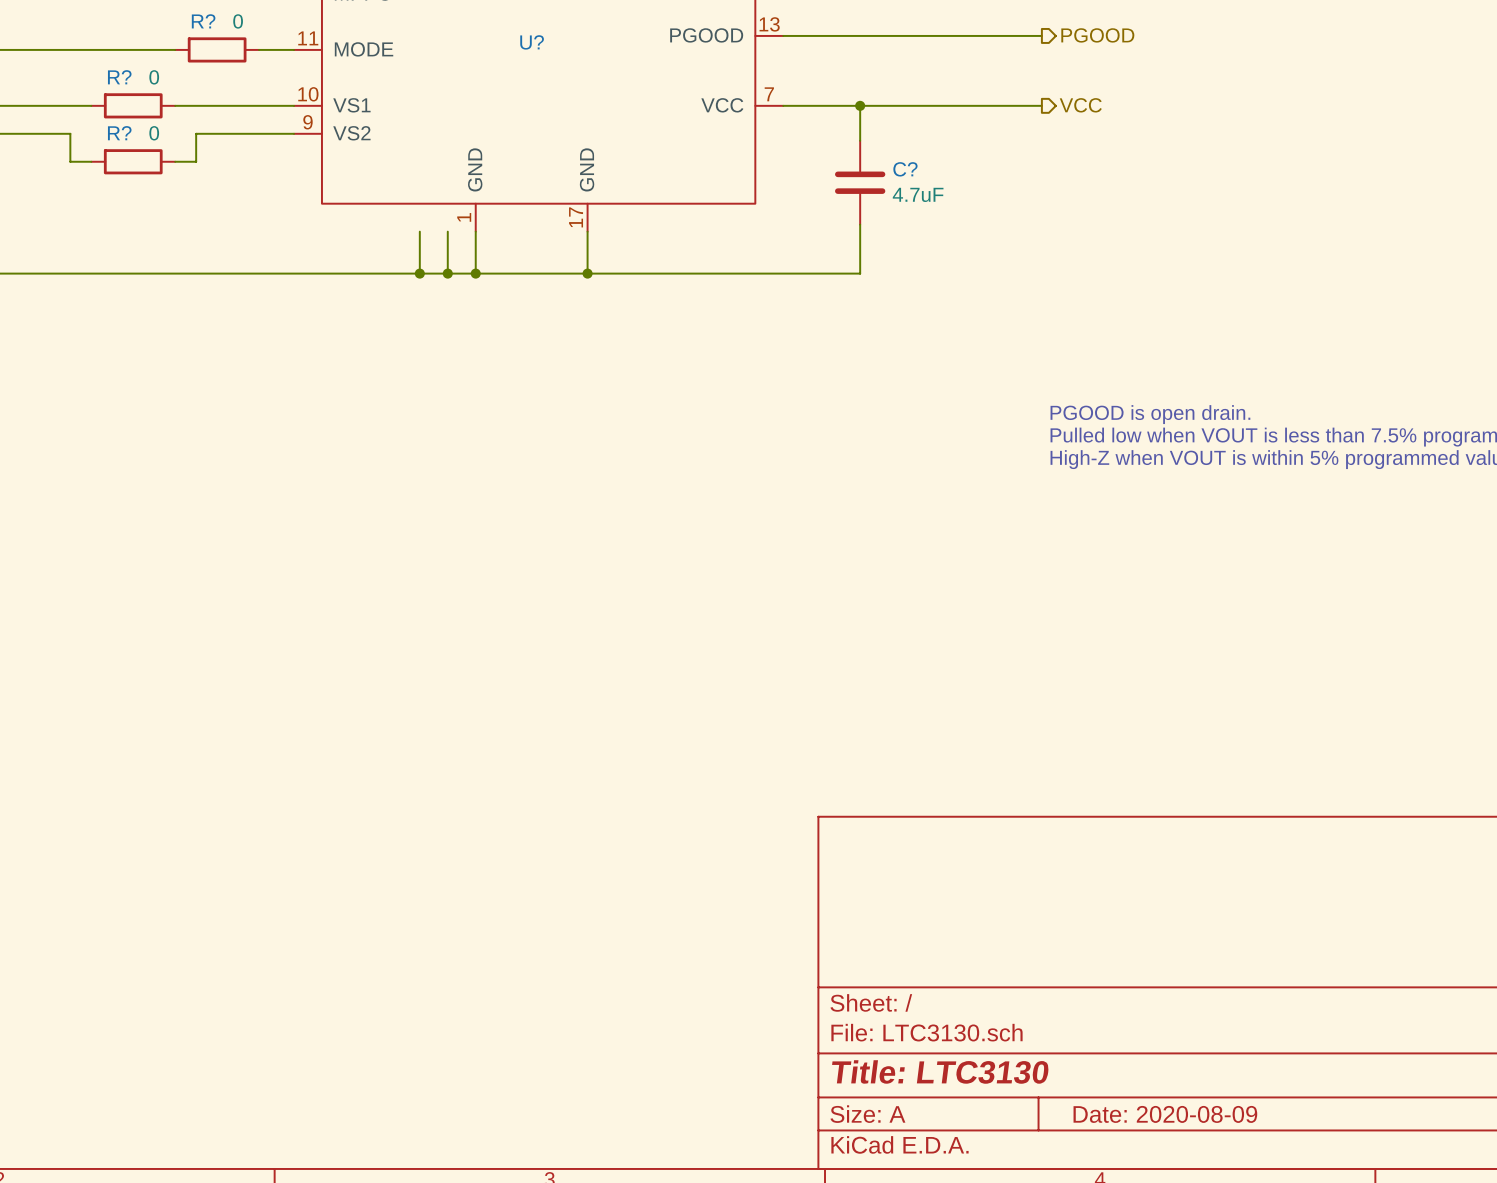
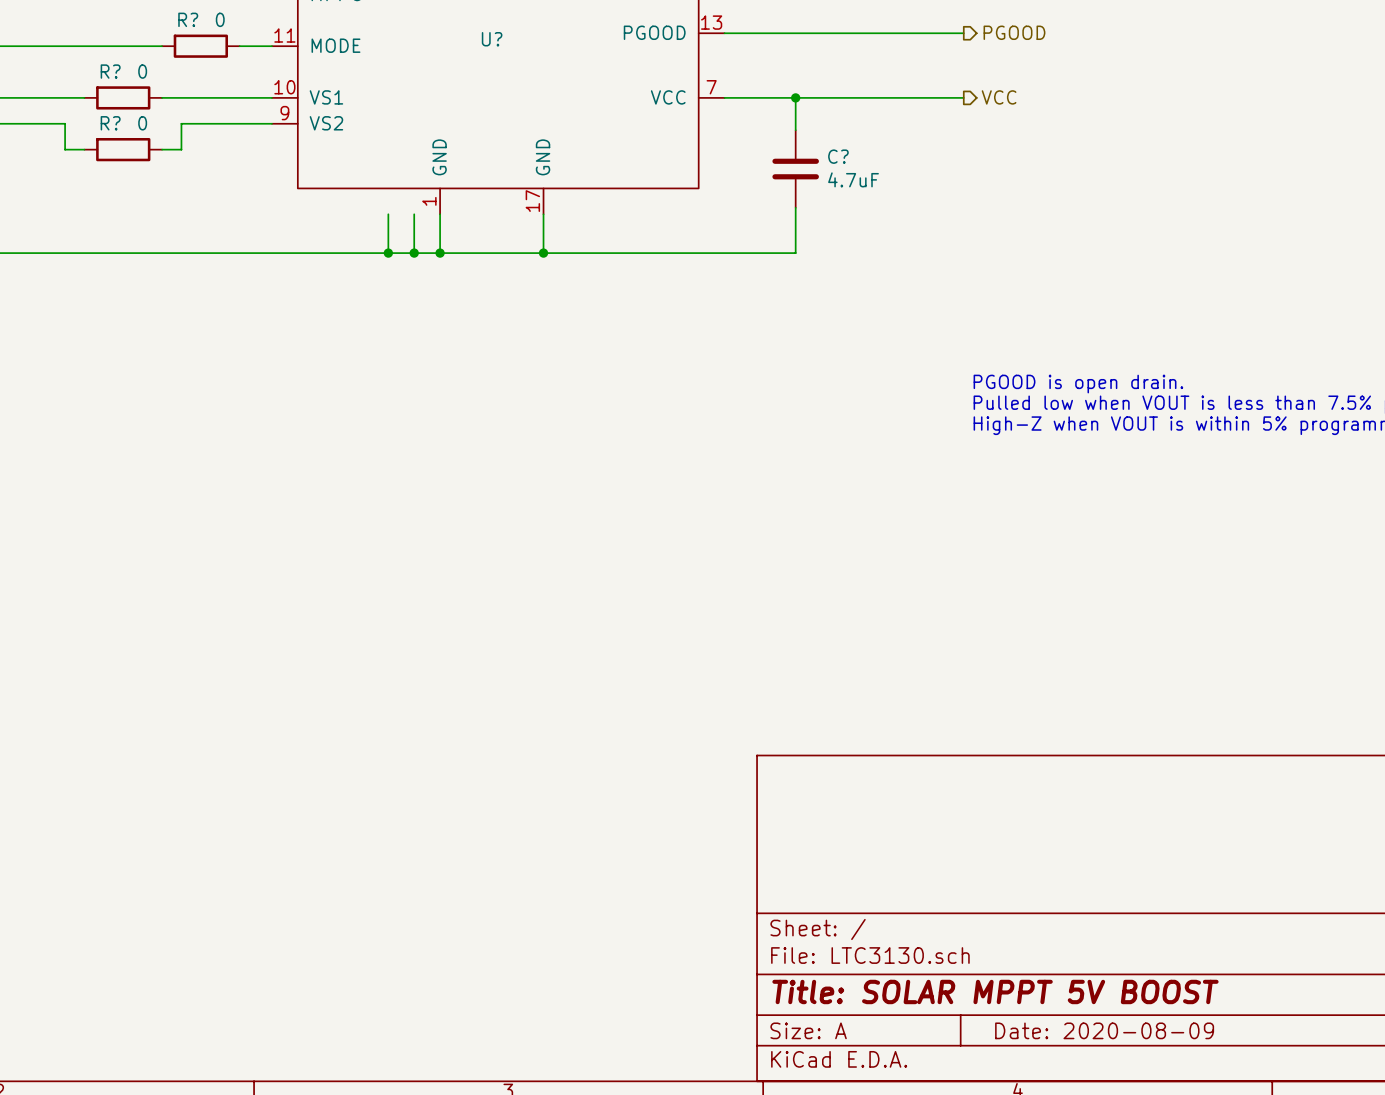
title block: Title: LTC3130 (940, 1071) -> Title: SOLAR MPPT 5V BOOST (995, 991)

